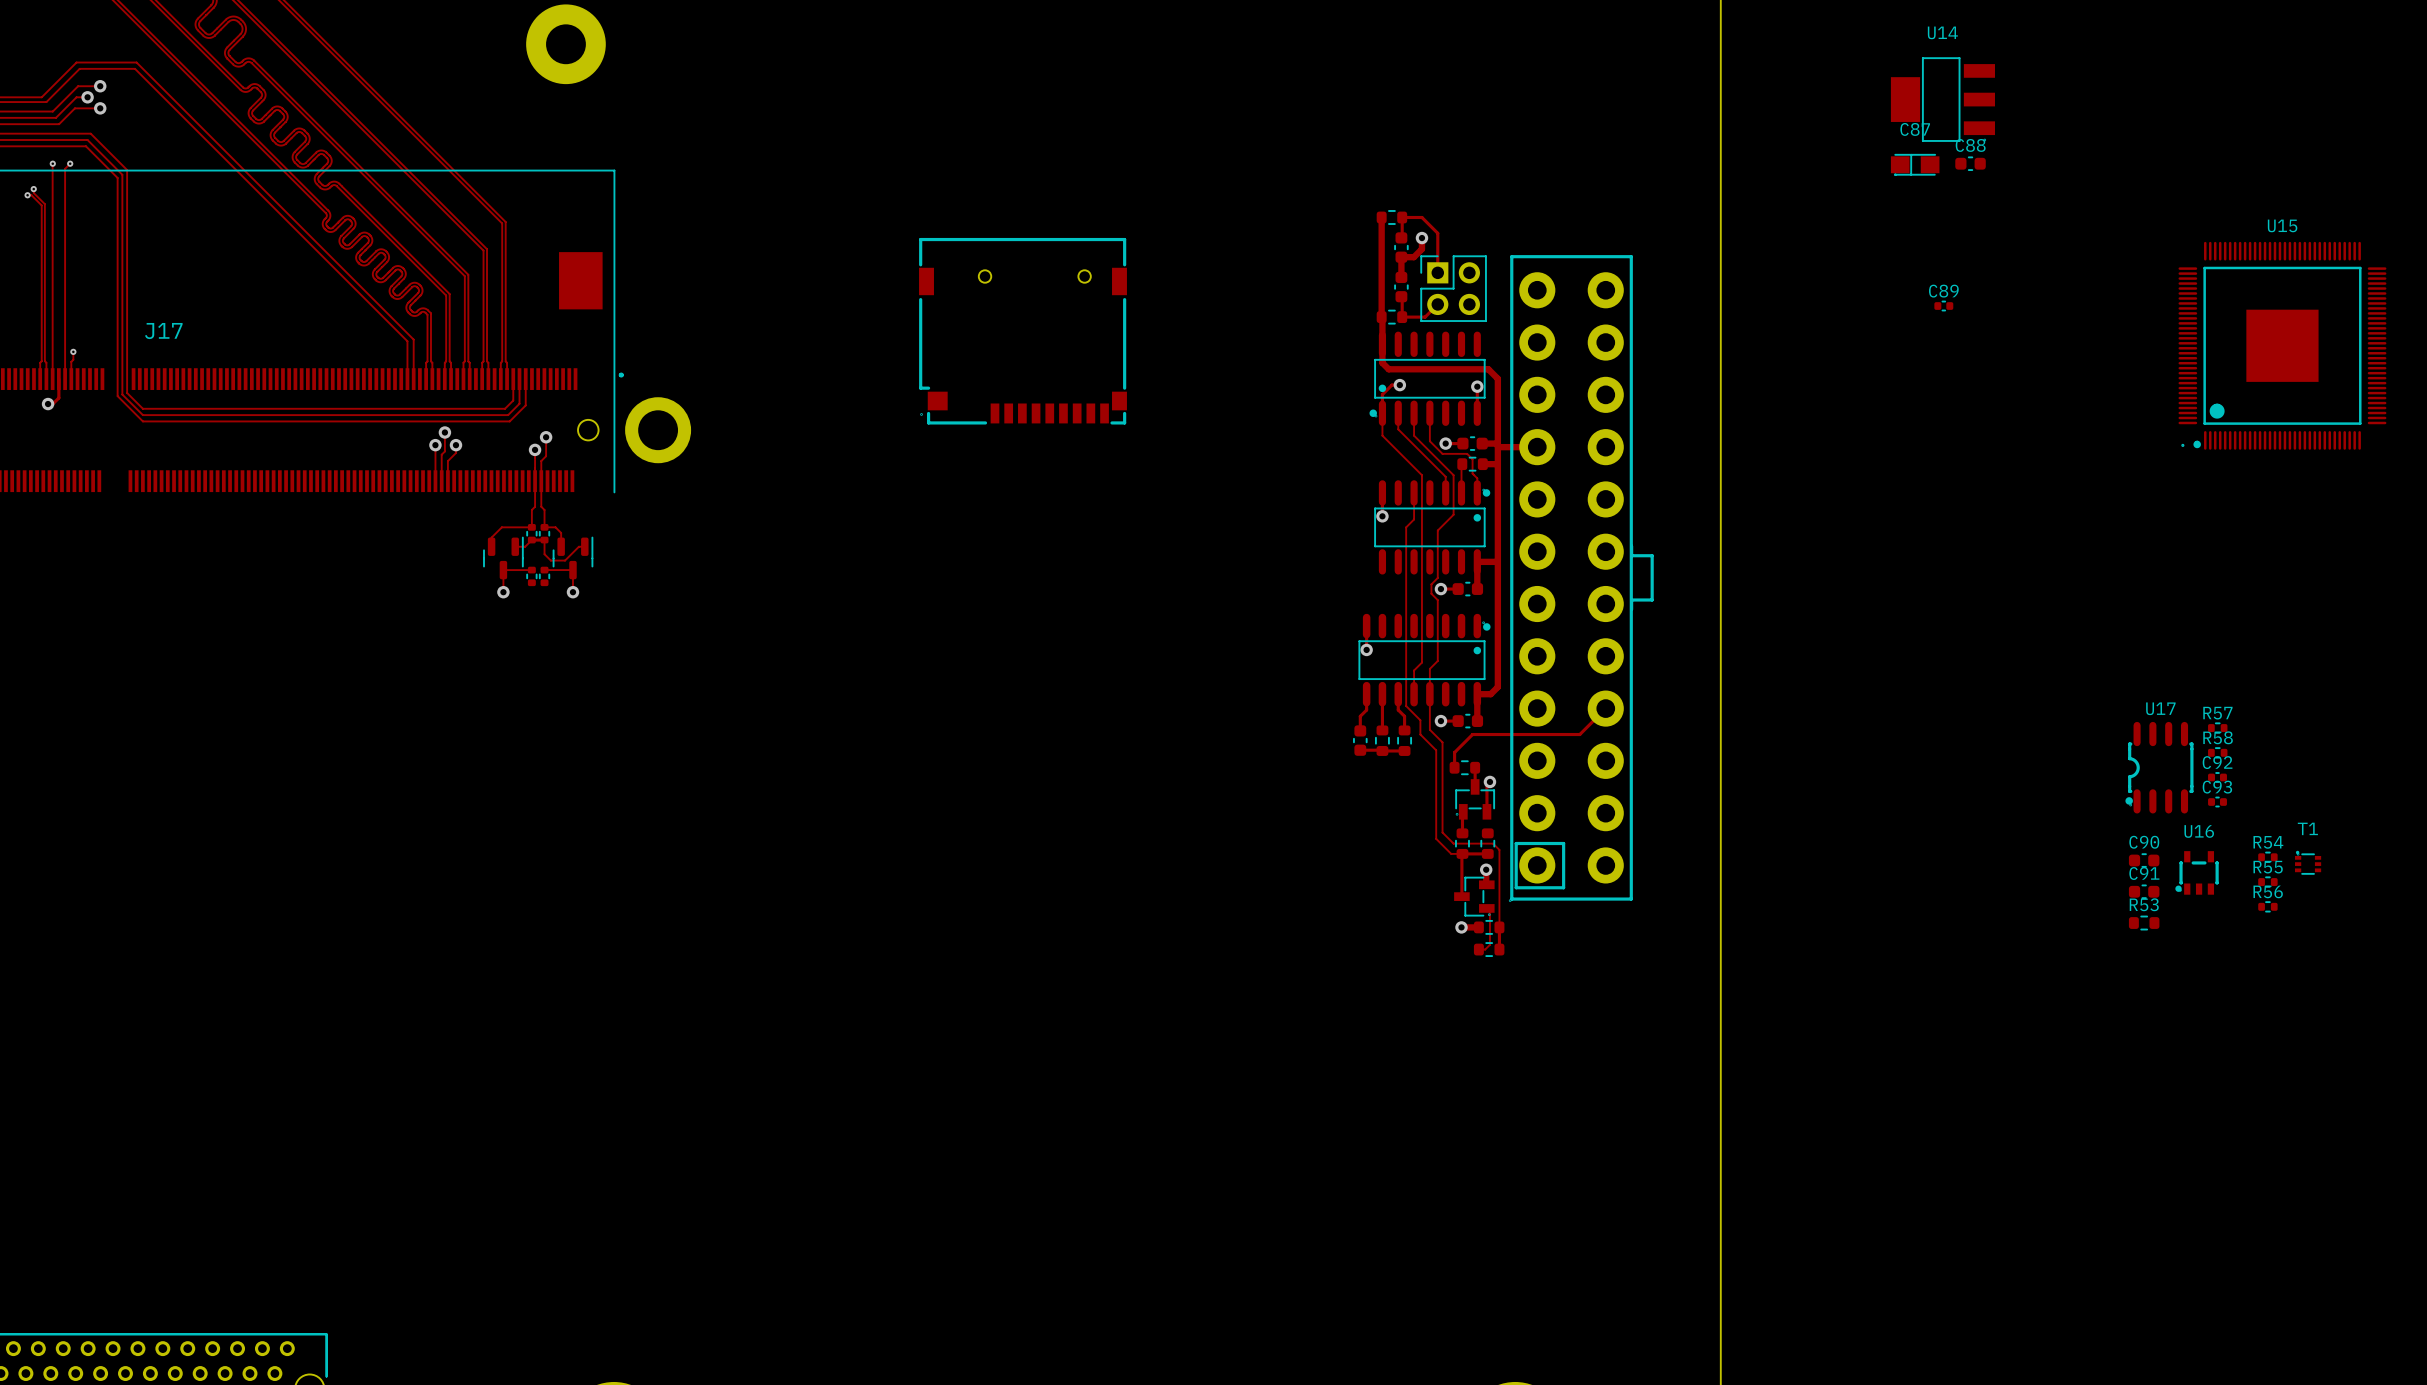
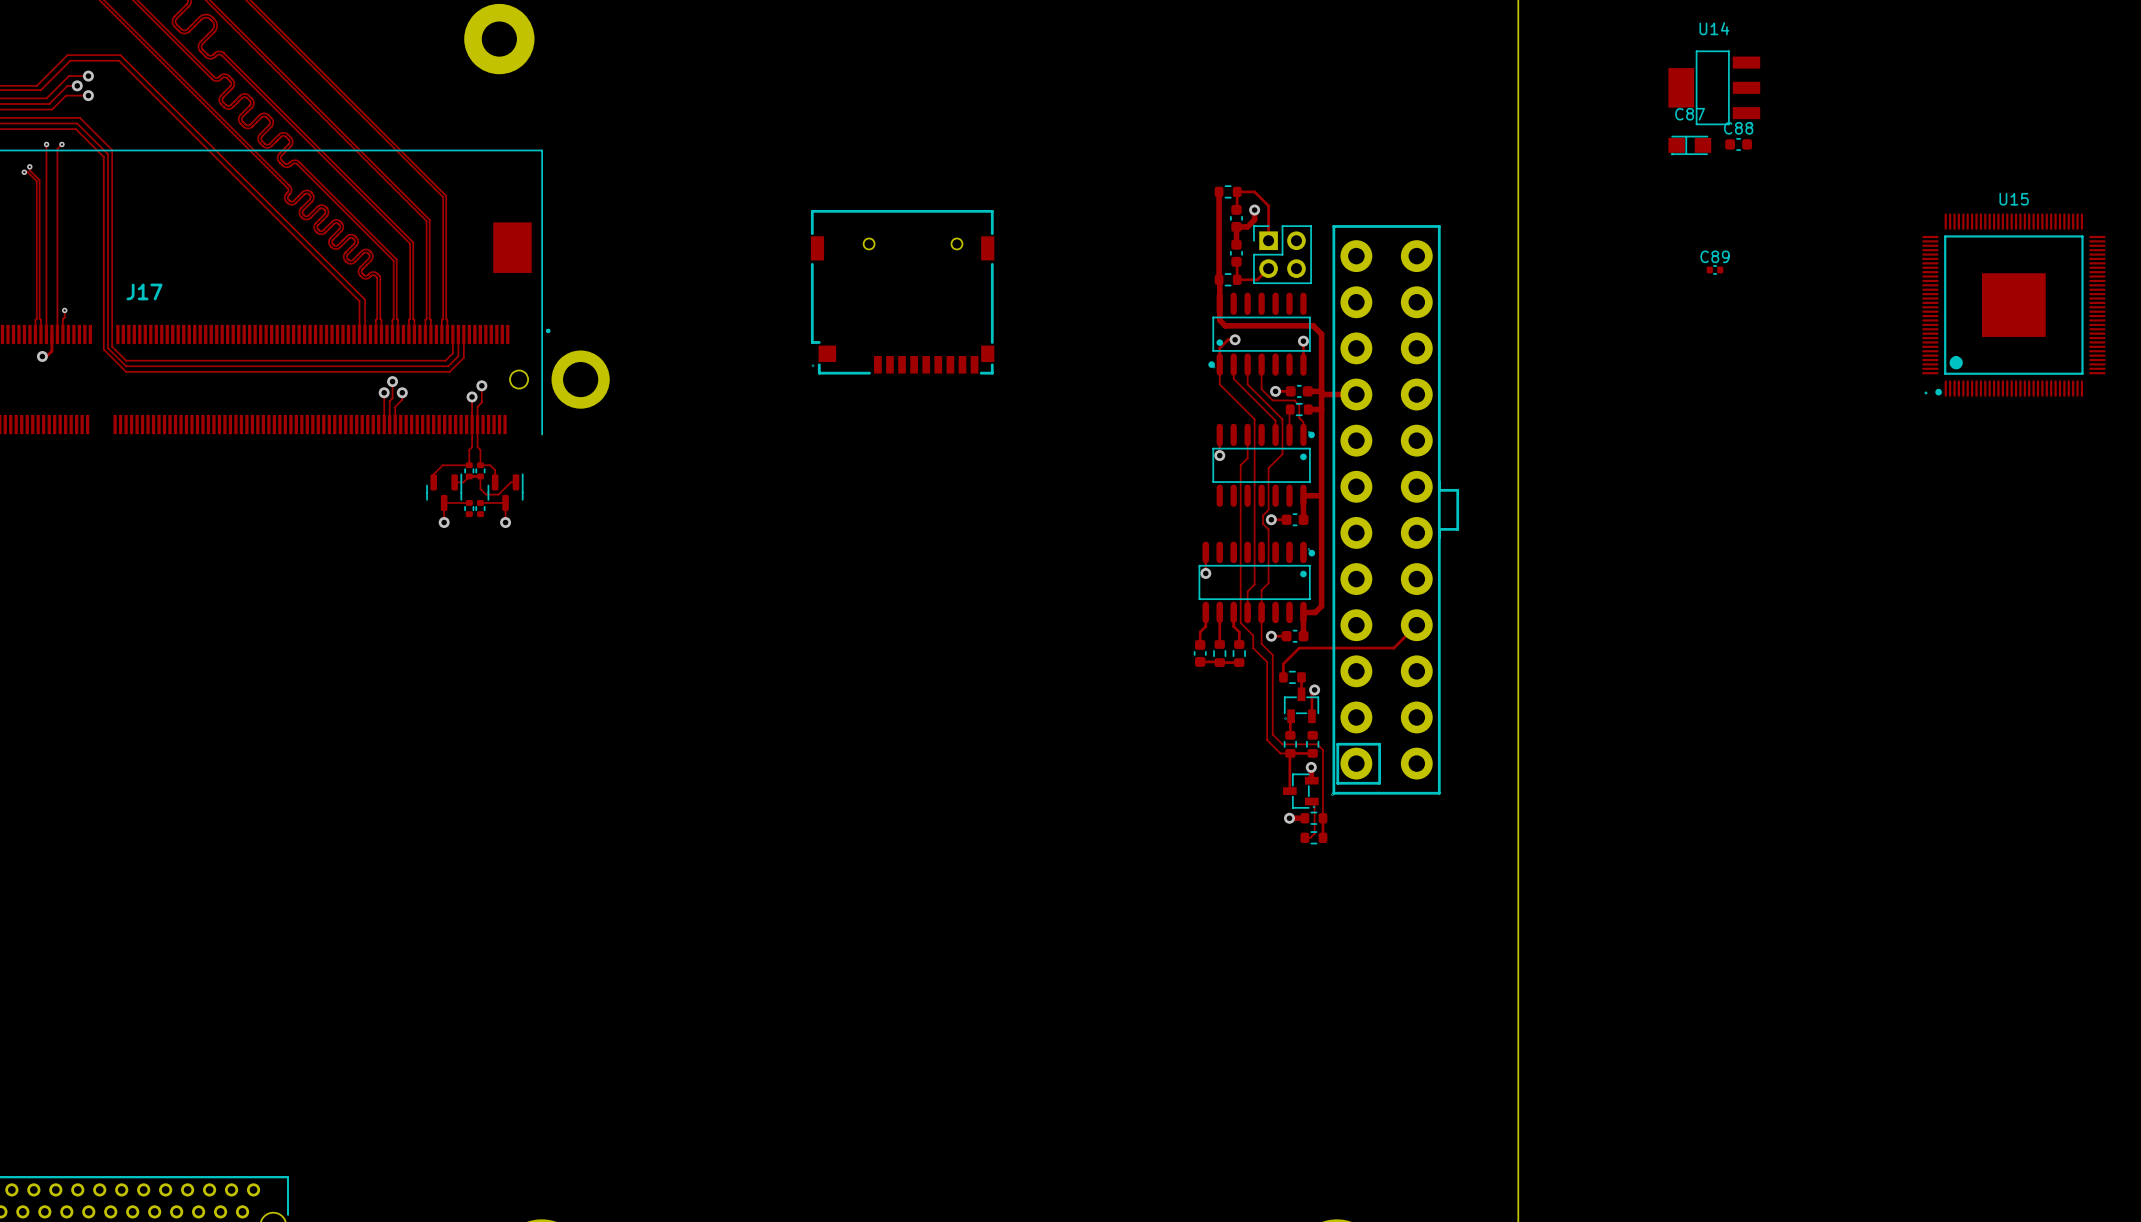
R57: (2217, 728) -> none
R58: (2217, 752) -> none
U17: (2159, 767) -> none
C92: (2217, 777) -> none
C93: (2217, 802) -> none
R54: (2267, 857) -> none
C90: (2144, 860) -> none
T1: (2308, 862) -> none
U16: (2197, 872) -> none
R55: (2267, 882) -> none
C91: (2144, 891) -> none
R56: (2267, 906) -> none
R53: (2144, 923) -> none

